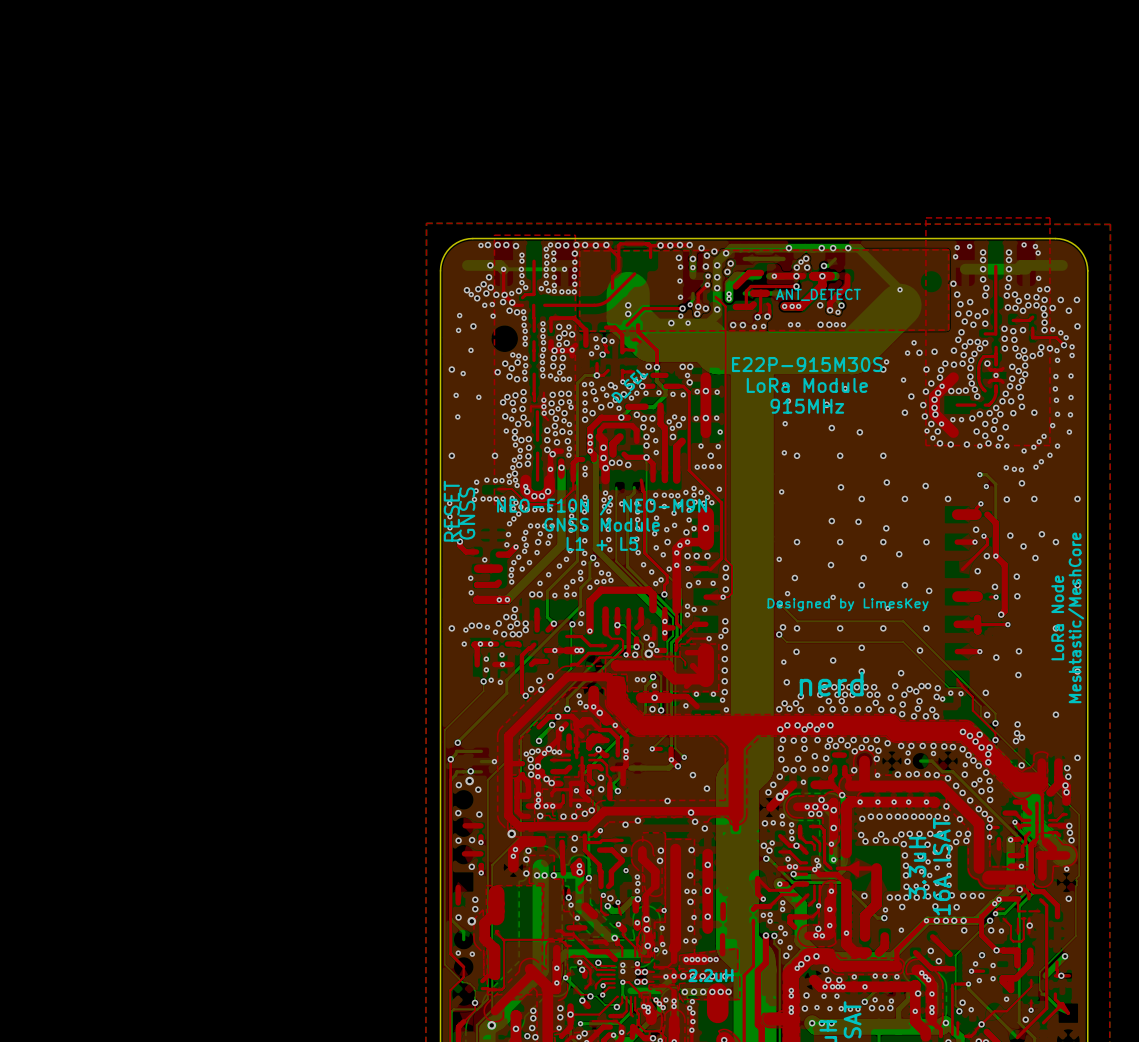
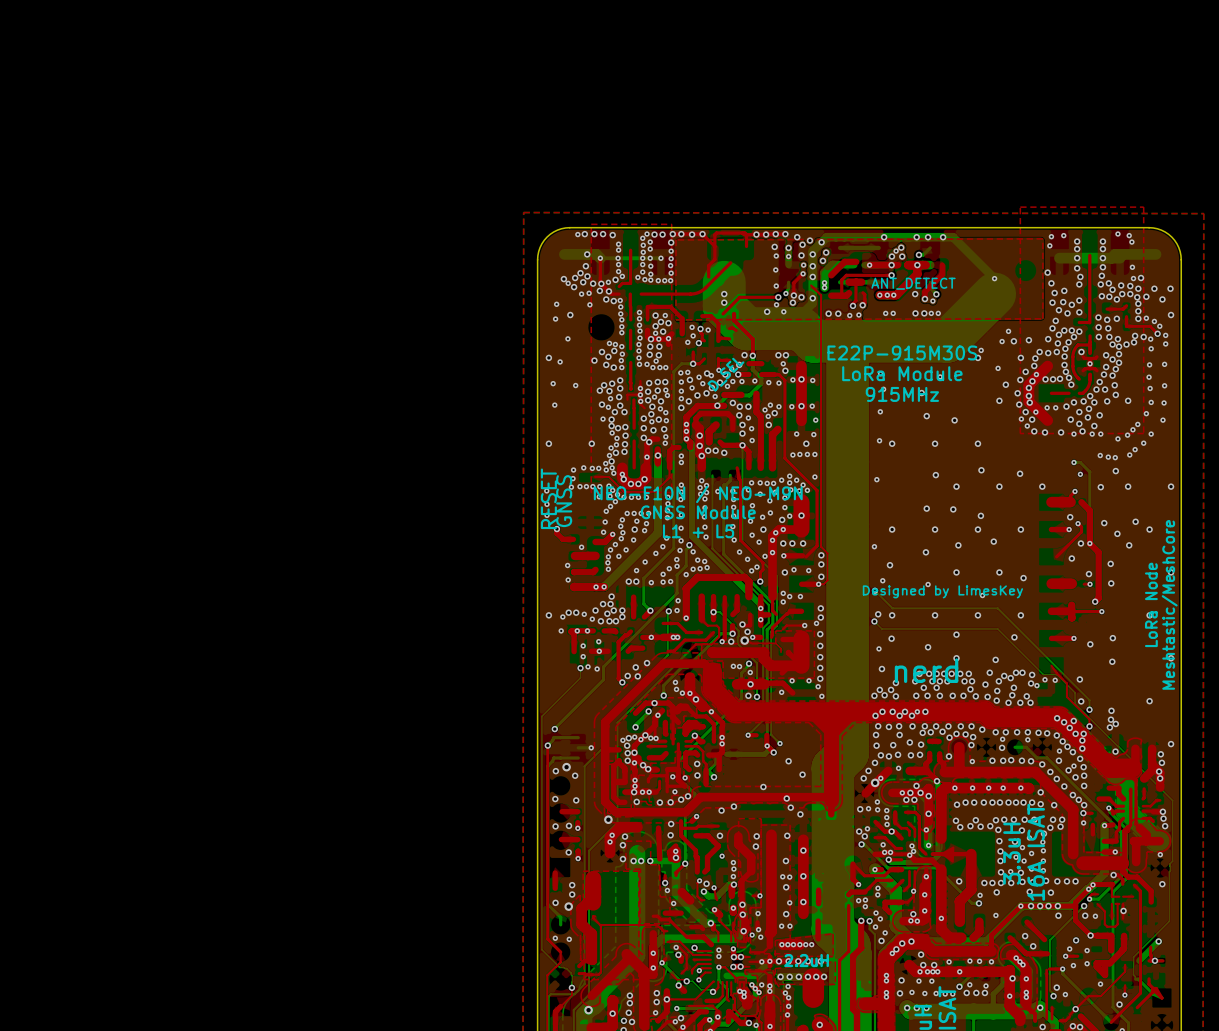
via: (470, 771) -> none

